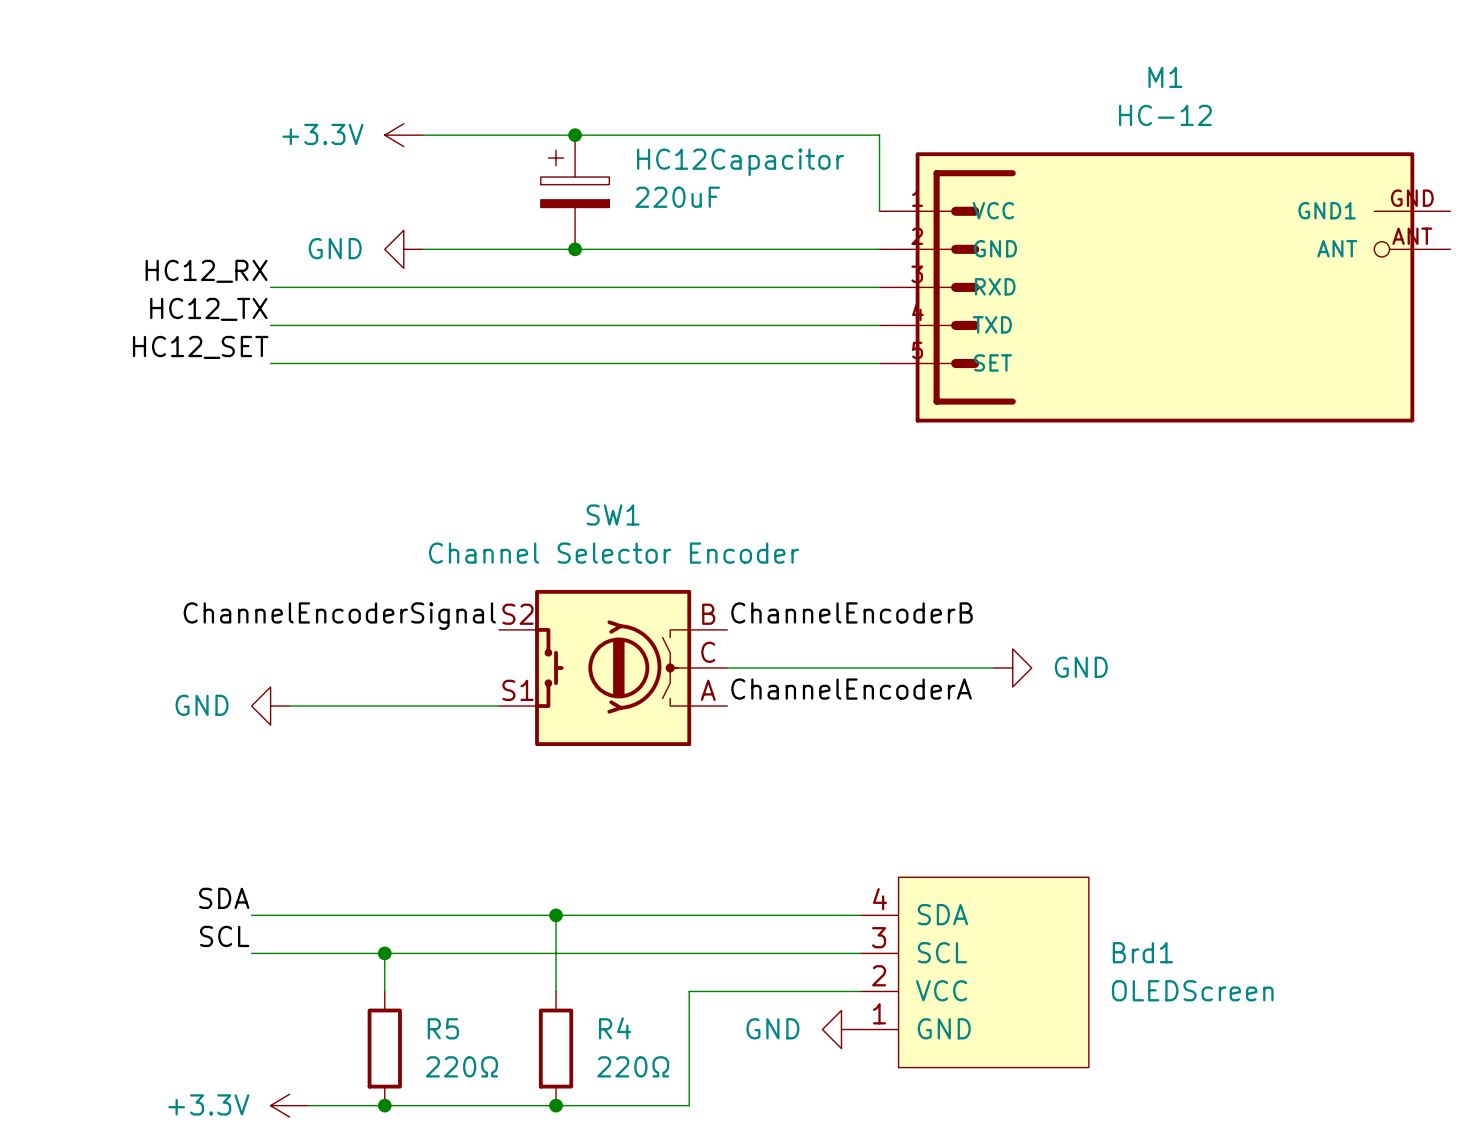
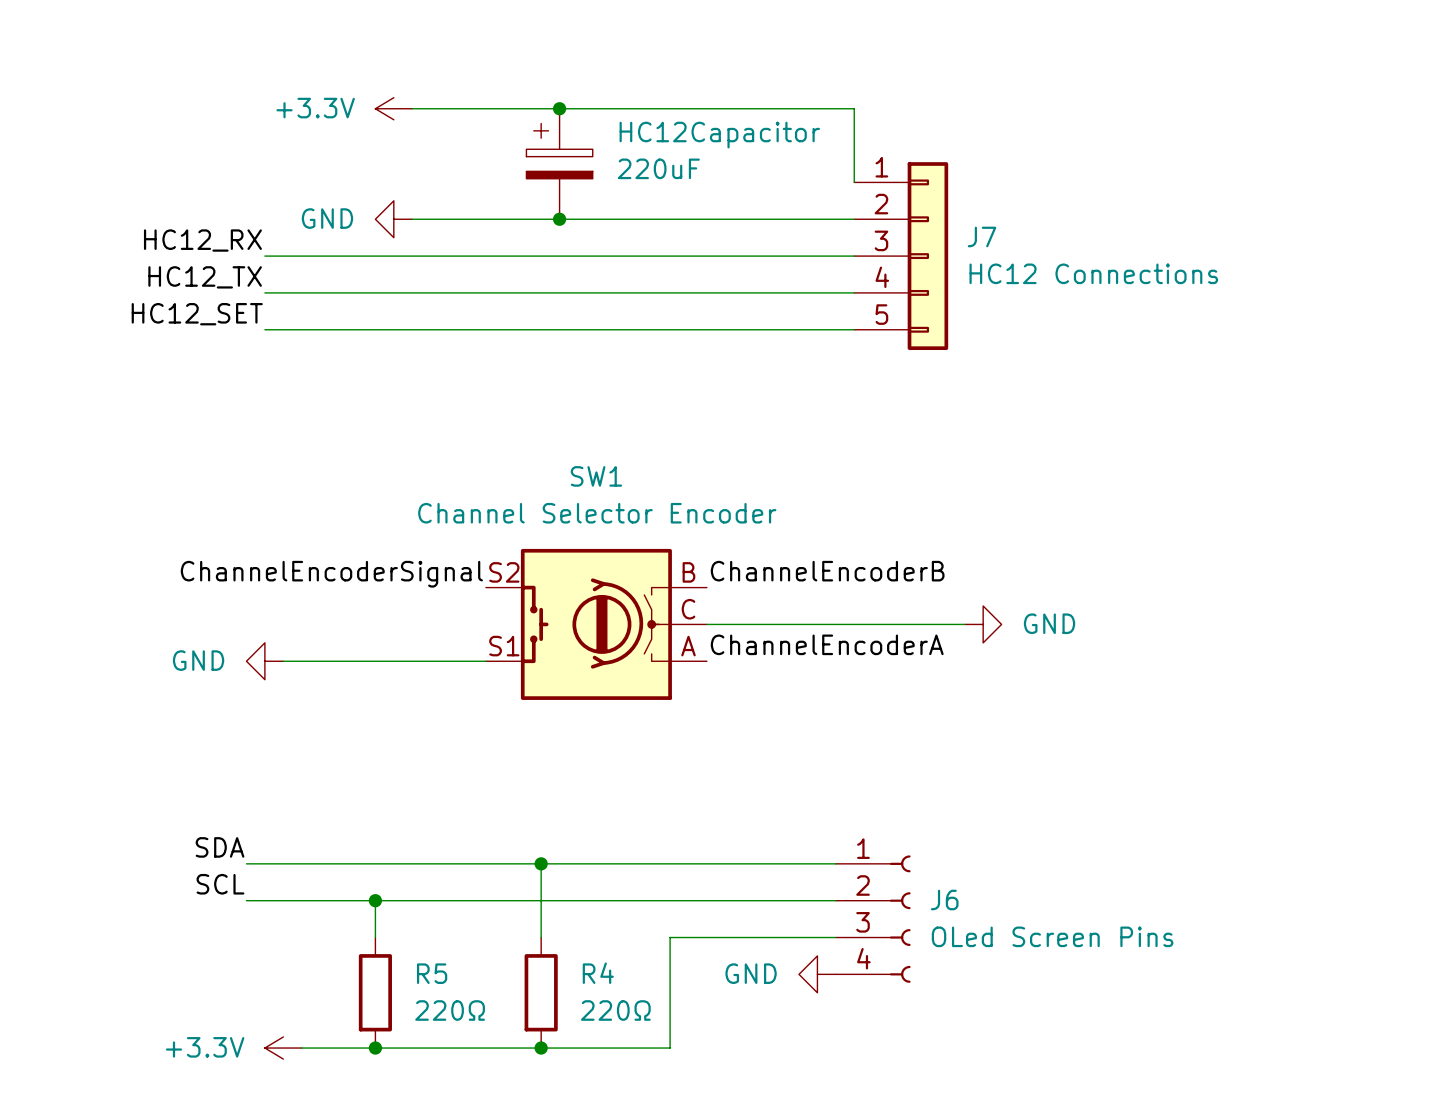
J7: none -> HC12 Connections (901, 256)
M1: HC-12 (1164, 287) -> none
J6: none -> OLed Screen Pins (873, 919)
Brd1: OLEDScreen (974, 972) -> none

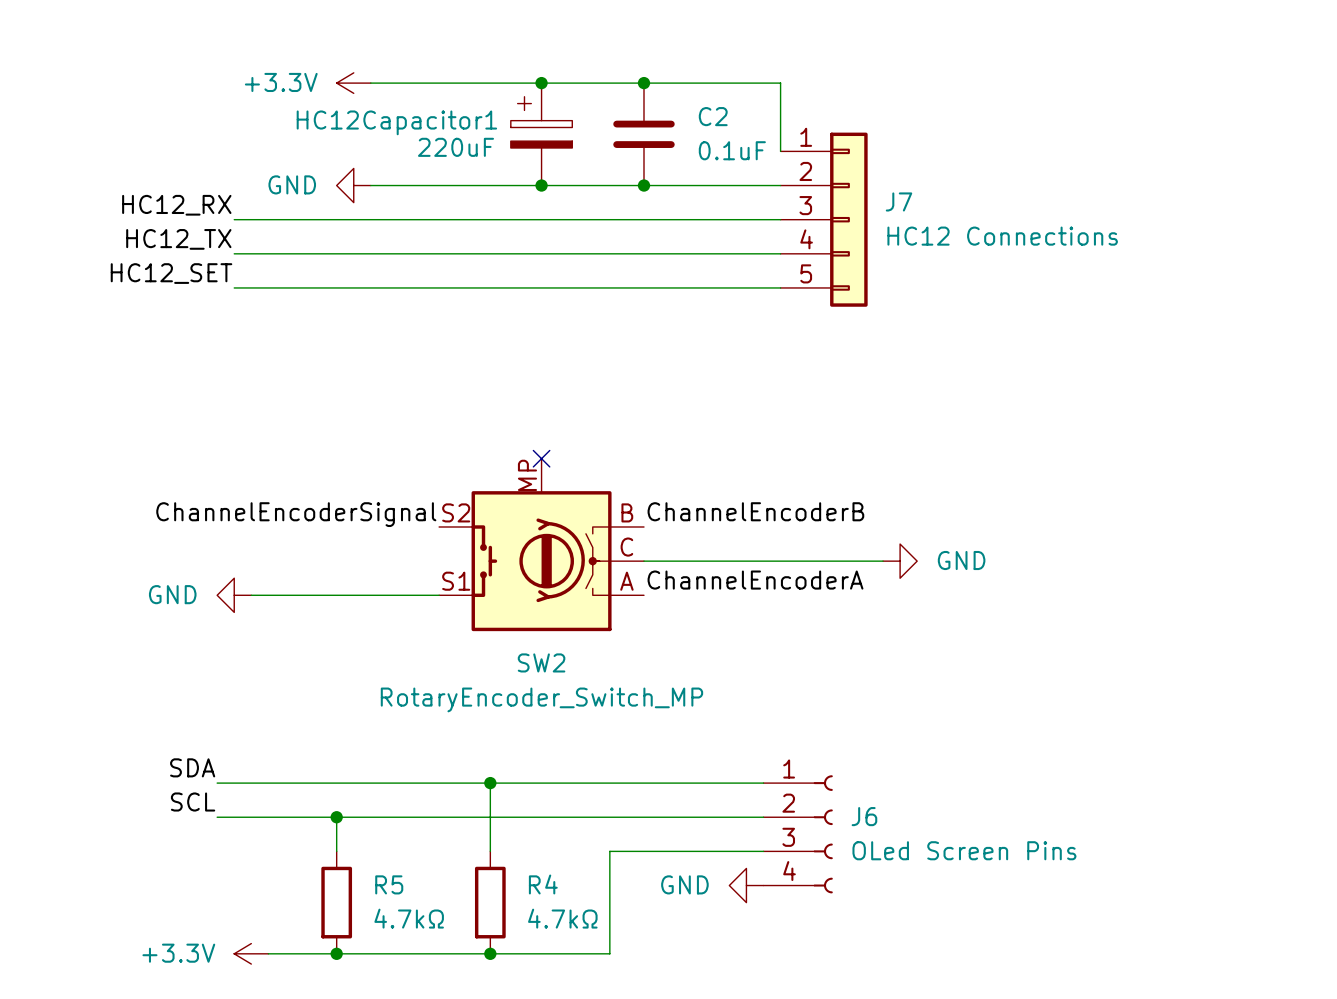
junction position: (559, 108) -> (541, 83)
junction: none -> (643, 83)
HC12Capacitor: 220uF (559, 164) -> none
HC12Capacitor1: none -> 220uF (541, 134)
C2: none -> 0.1uF (643, 134)
junction position: (559, 219) -> (541, 185)
junction: none -> (643, 185)
no-connect mark: none -> (541, 458)
SW2: none -> RotaryEncoder_Switch_MP (541, 544)
SW1: Channel Selector Encoder (596, 624) -> none
R5 value: 220Ω (450, 1010) -> 4.7kΩ (409, 918)
R4 value: 220Ω (615, 1010) -> 4.7kΩ (562, 918)

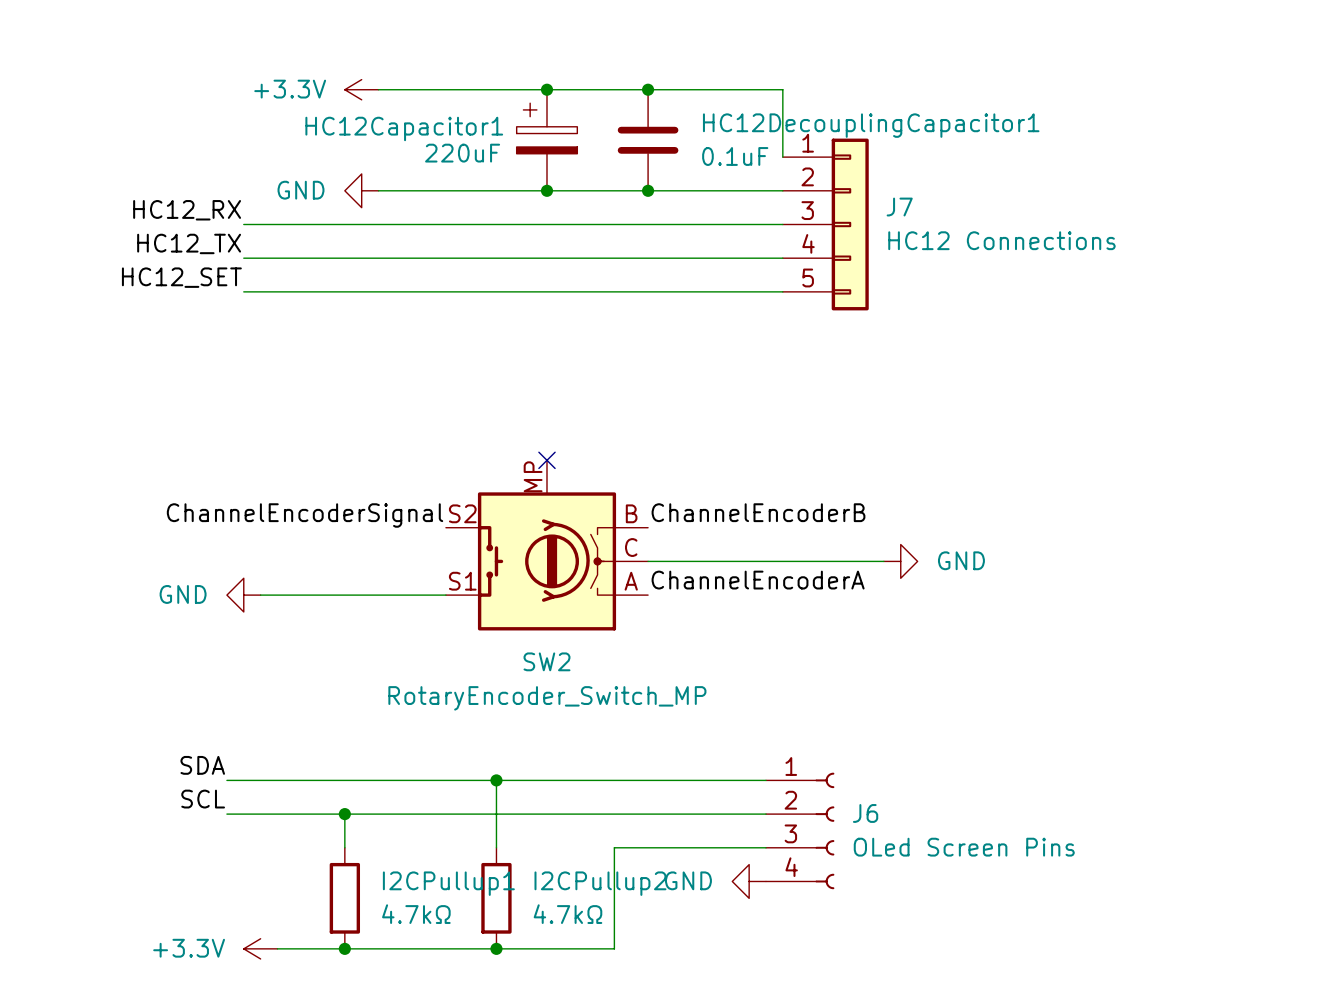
C2 name: C2 (713, 116) -> HC12DecouplingCapacitor1 (871, 125)
R5 name: R5 (389, 884) -> I2CPullup1 (448, 883)
R4 name: R4 (543, 884) -> I2CPullup2 (600, 883)

